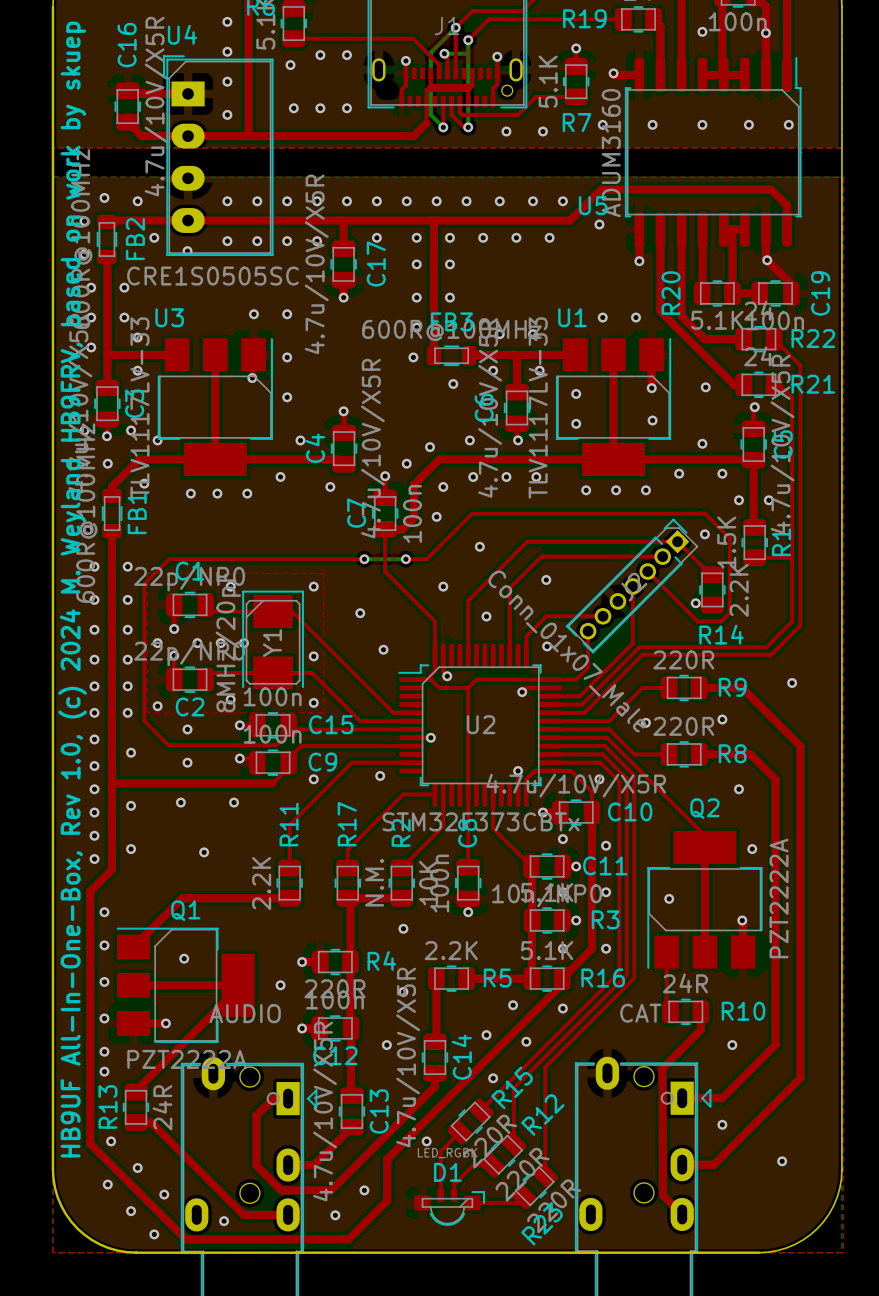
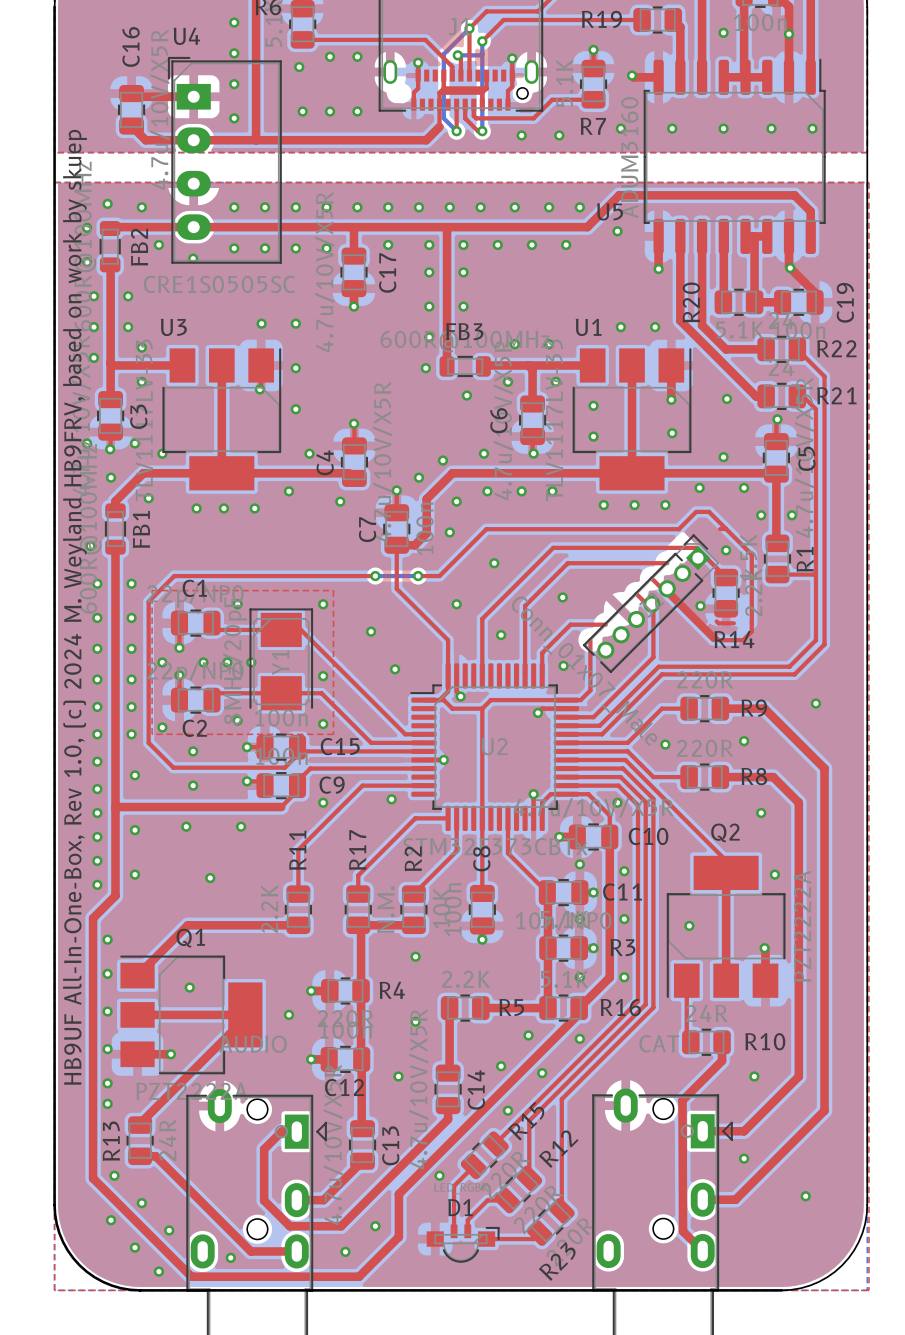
top track: (659, 513) (698, 513) -> (678, 529) (696, 511) (709, 511) (726, 529)
top track: (527, 541) (677, 541) (712, 574) -> (543, 558) (553, 547) (696, 547) (726, 577)
top track: (541, 556) (662, 556) -> (557, 573) (567, 563) (667, 563)
top track: none -> (651, 578) (713, 640)
top track: (632, 586) (632, 643) (579, 696) (576, 696) -> (636, 593) (653, 610) (653, 657) (593, 717)
R14 position: (712, 589) -> (726, 593)
via position: (695, 603) -> (700, 605)
top track: (603, 616) (546, 616) (526, 636) -> (605, 624) (570, 624) (542, 653) (542, 655)
top track: (588, 631) (588, 667) (576, 679) (563, 679) -> (590, 640) (590, 690) (580, 700)

